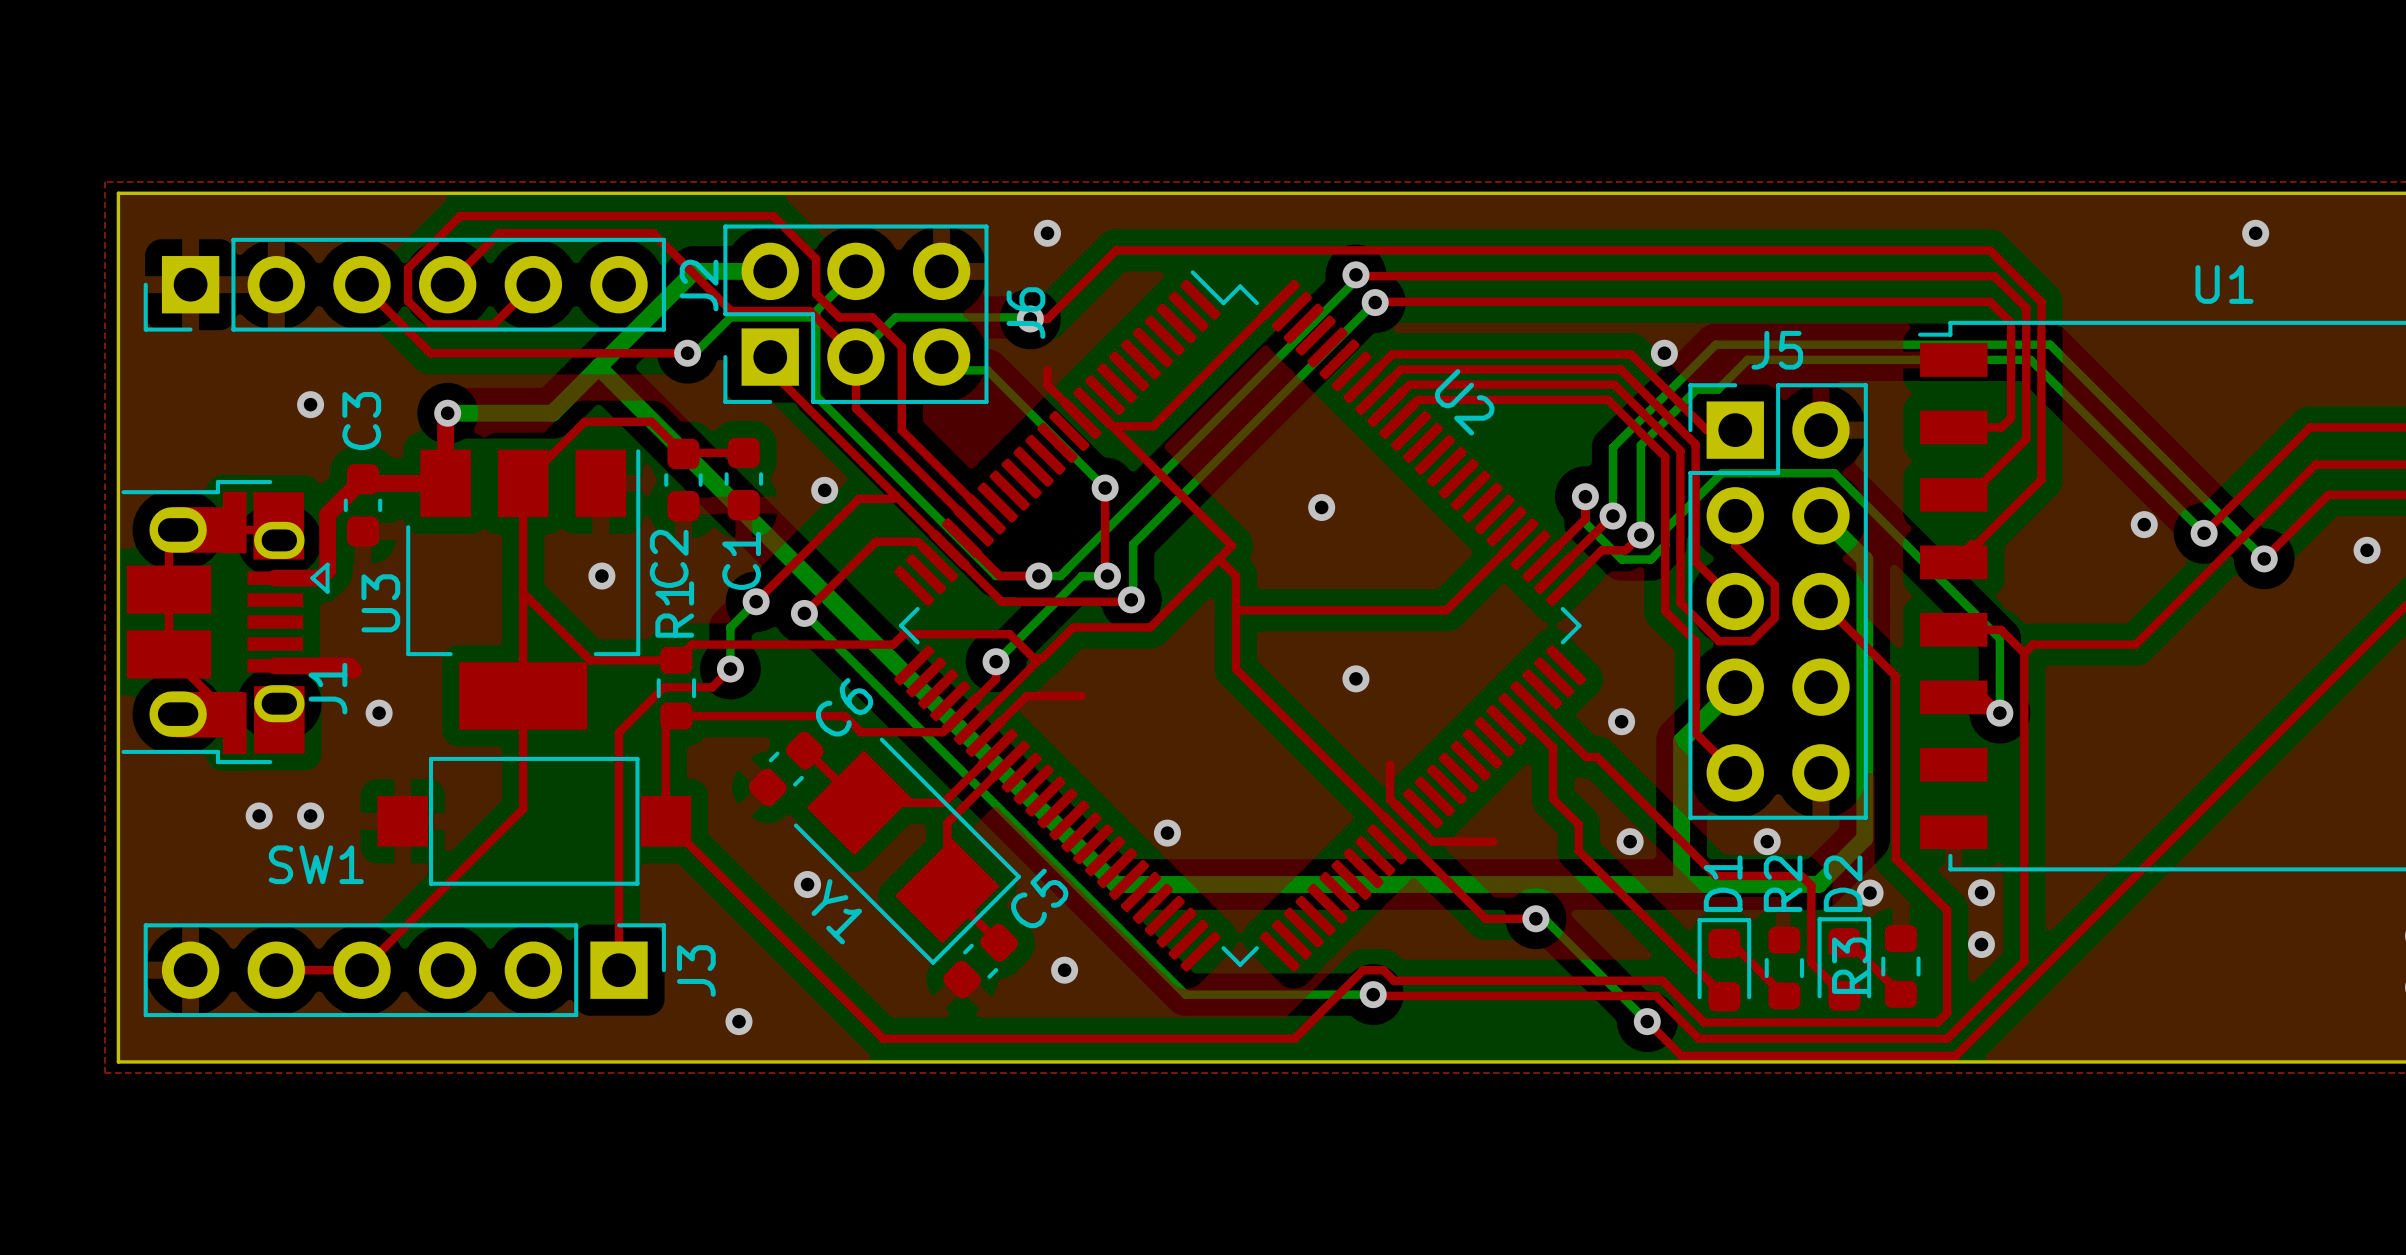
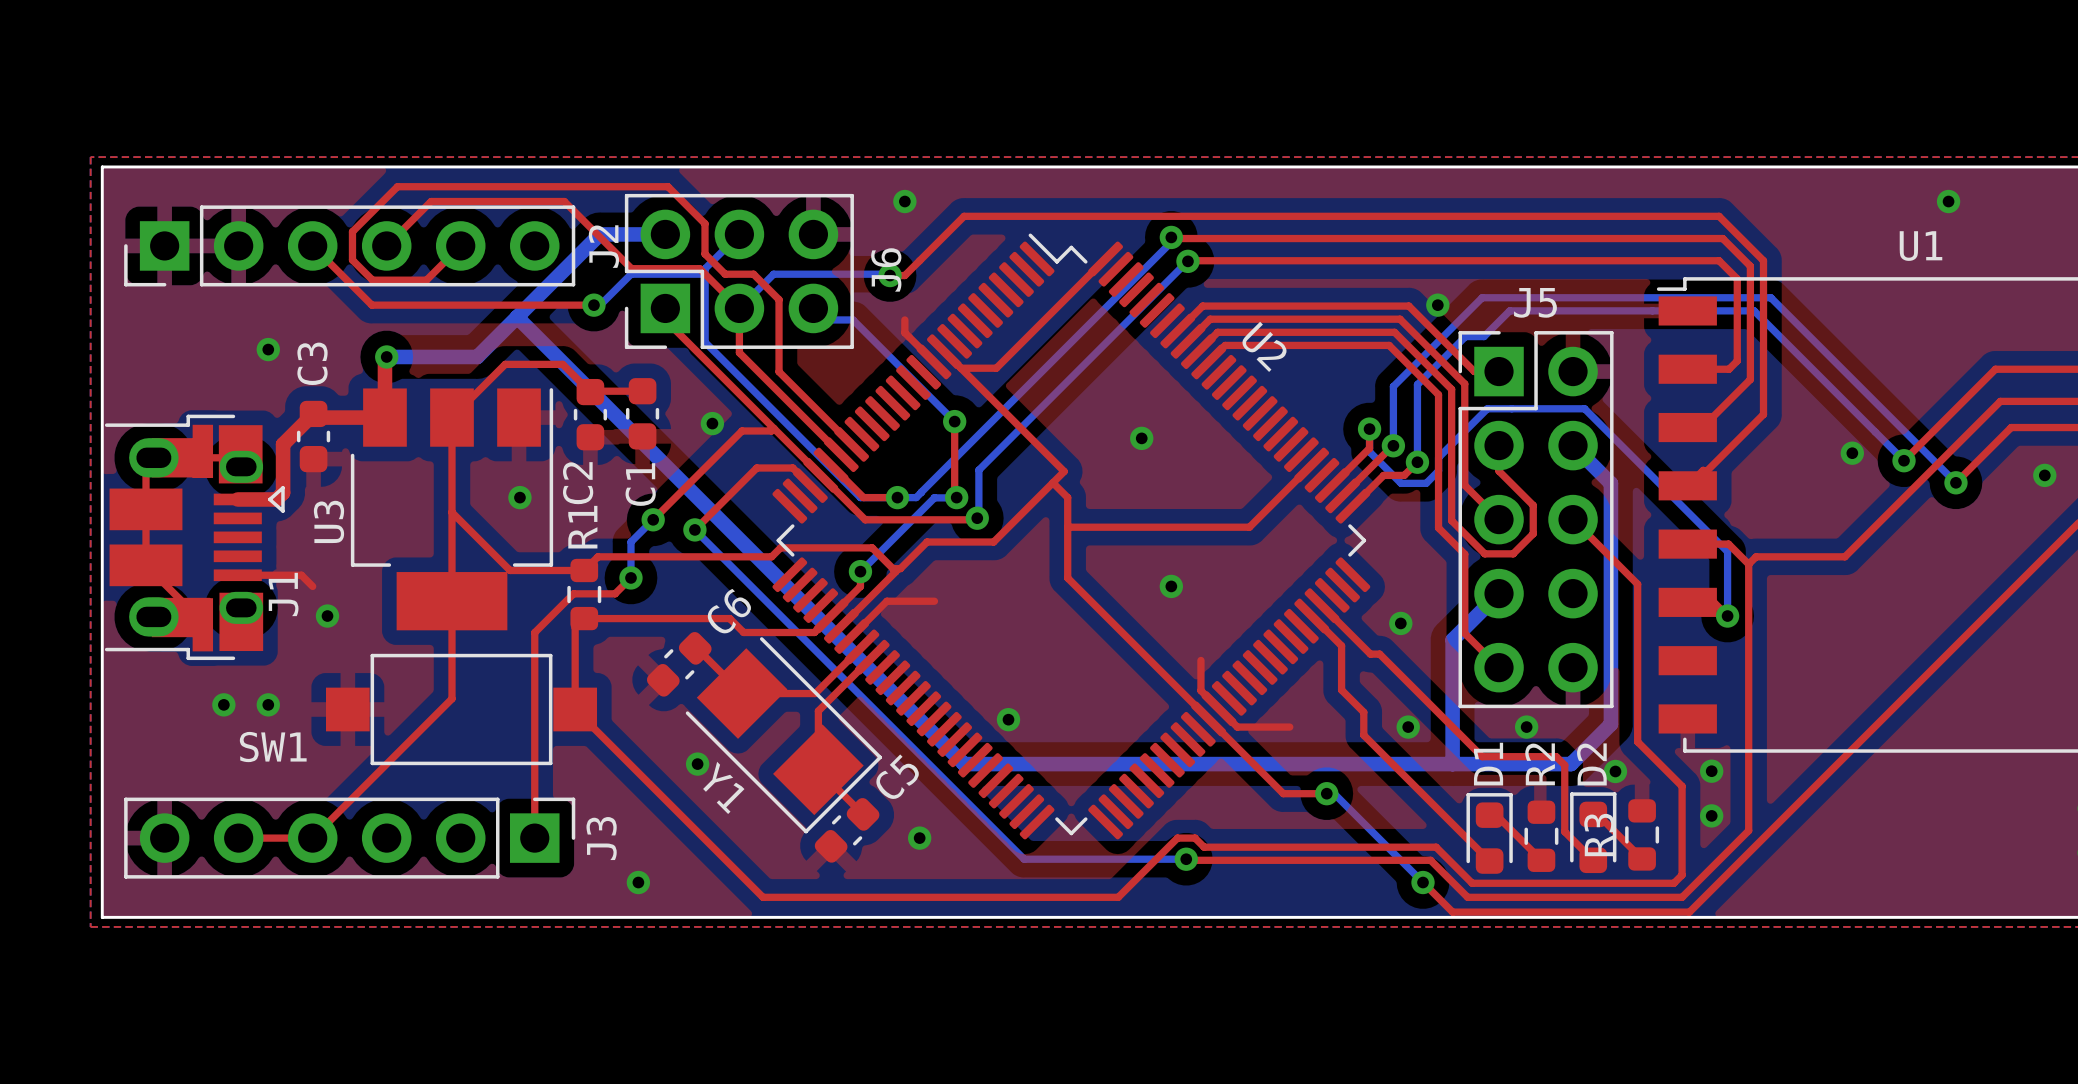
top track width: thick (275, 665) (349, 665) (353, 670) -> thin (237, 575) (301, 575) (305, 579)
top track: none -> (305, 579) (312, 586)

